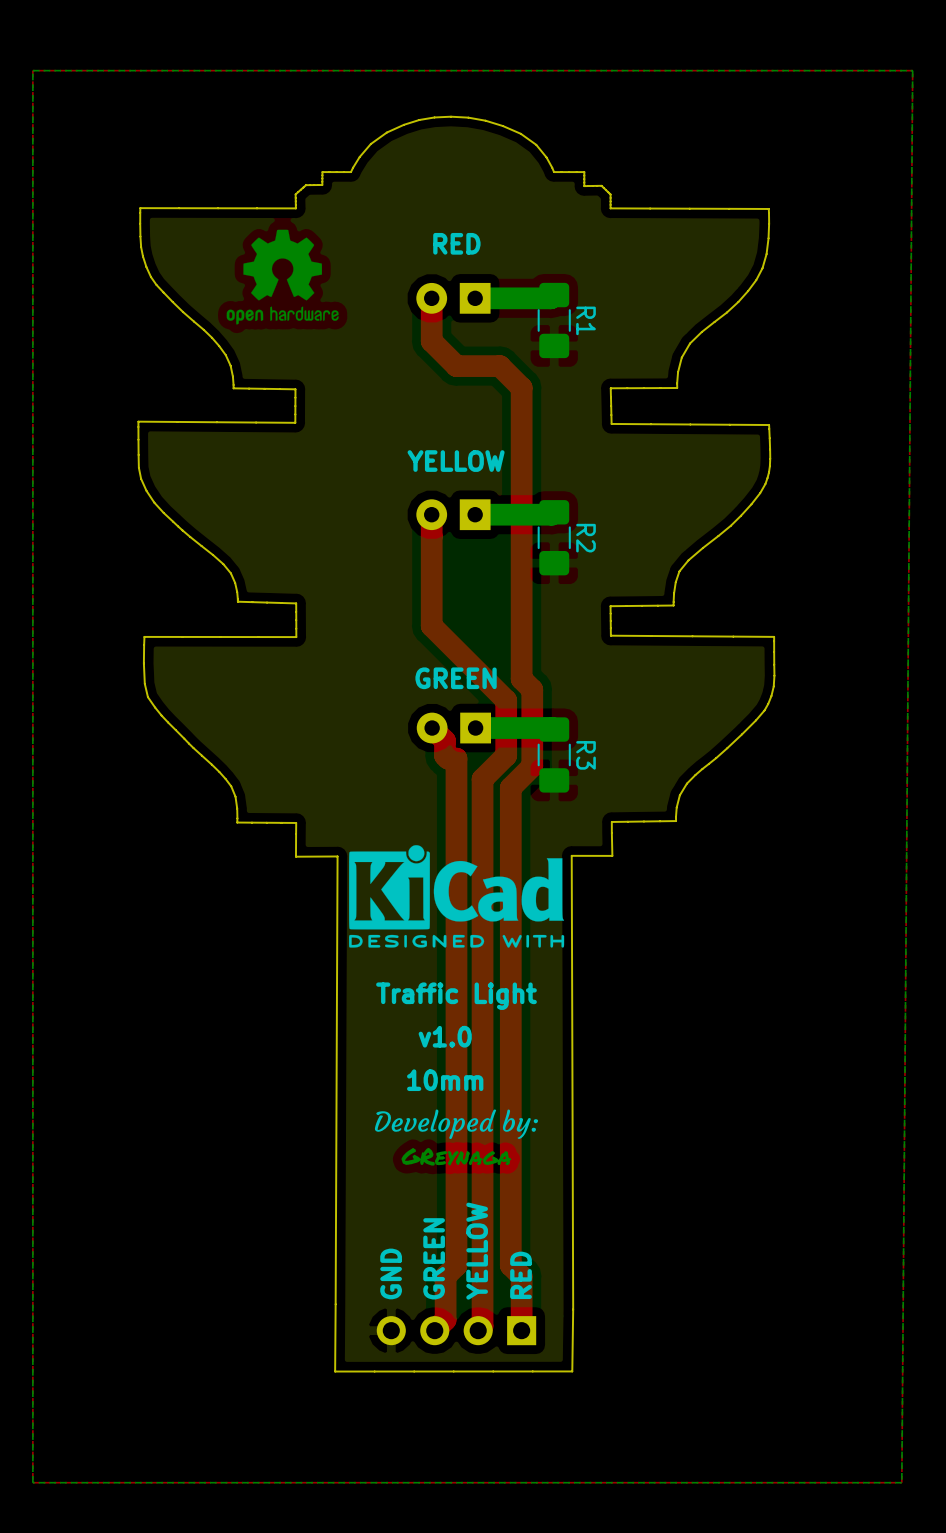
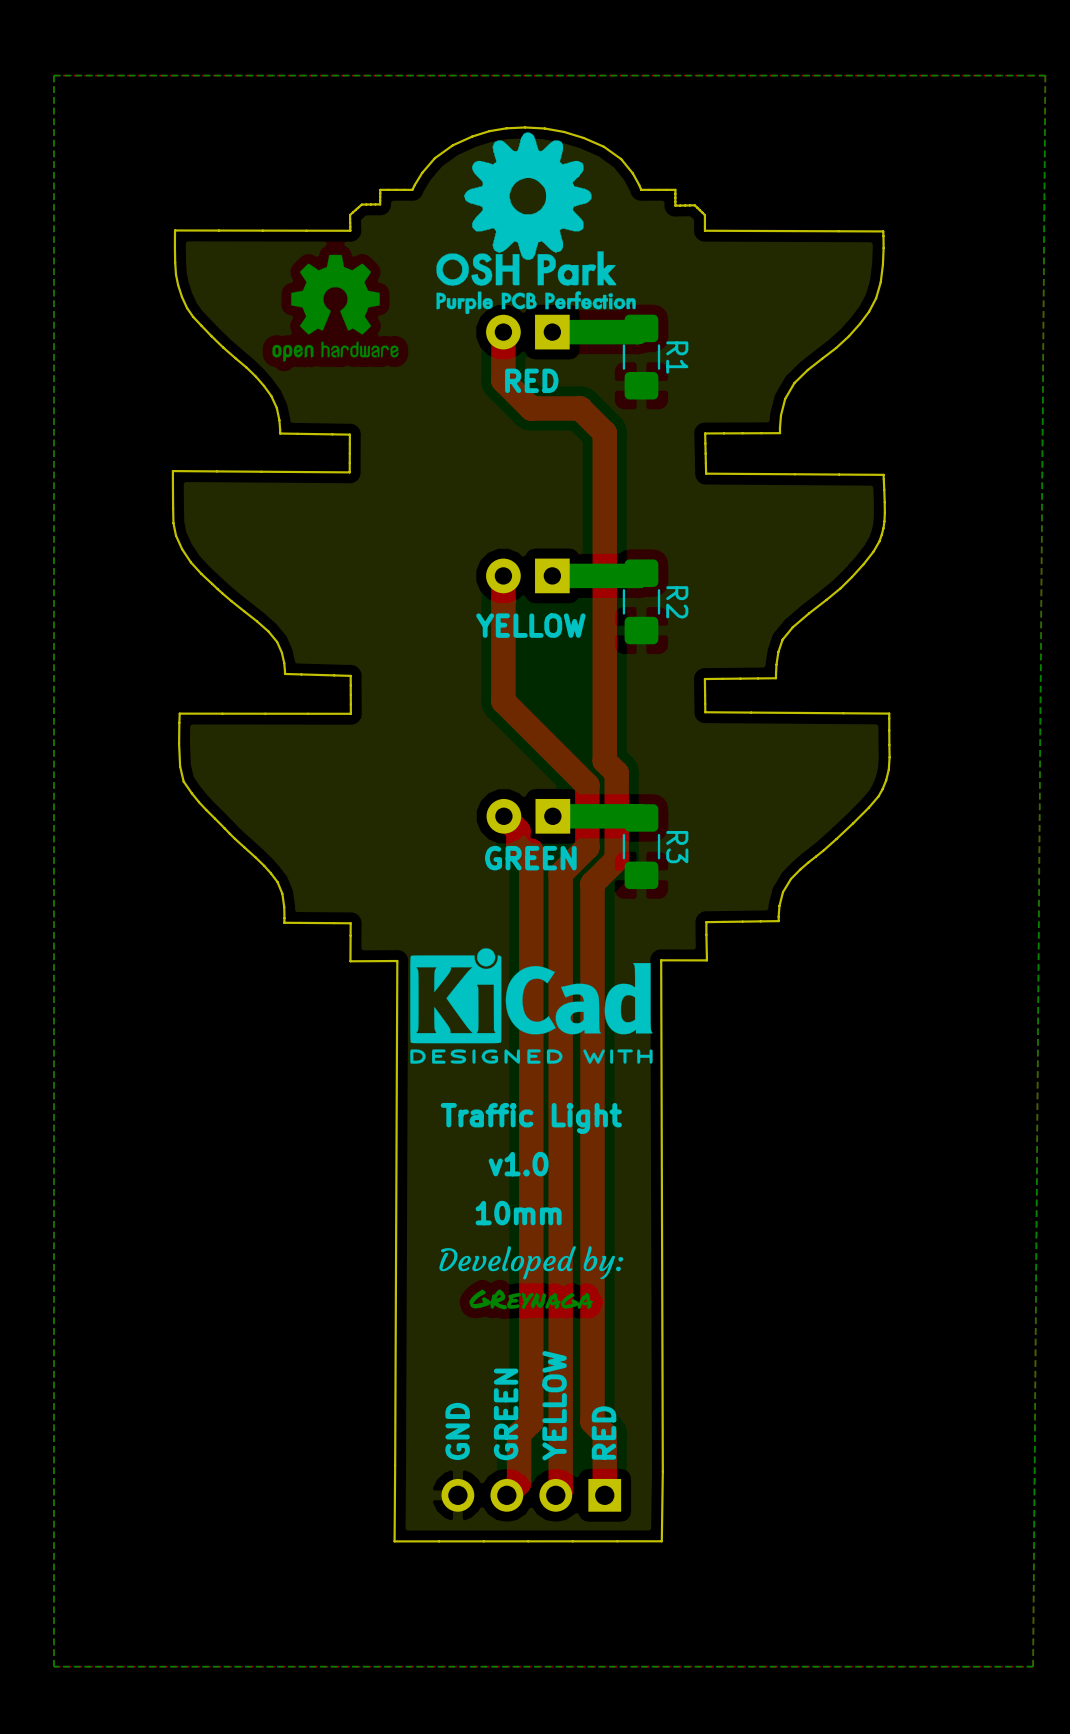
drawing: none -> [436, 132, 636, 315]
text position: RED (456, 243) -> RED (531, 380)
text position: YELLOW (456, 461) -> YELLOW (530, 625)
text position: GREEN (456, 678) -> GREEN (530, 858)

